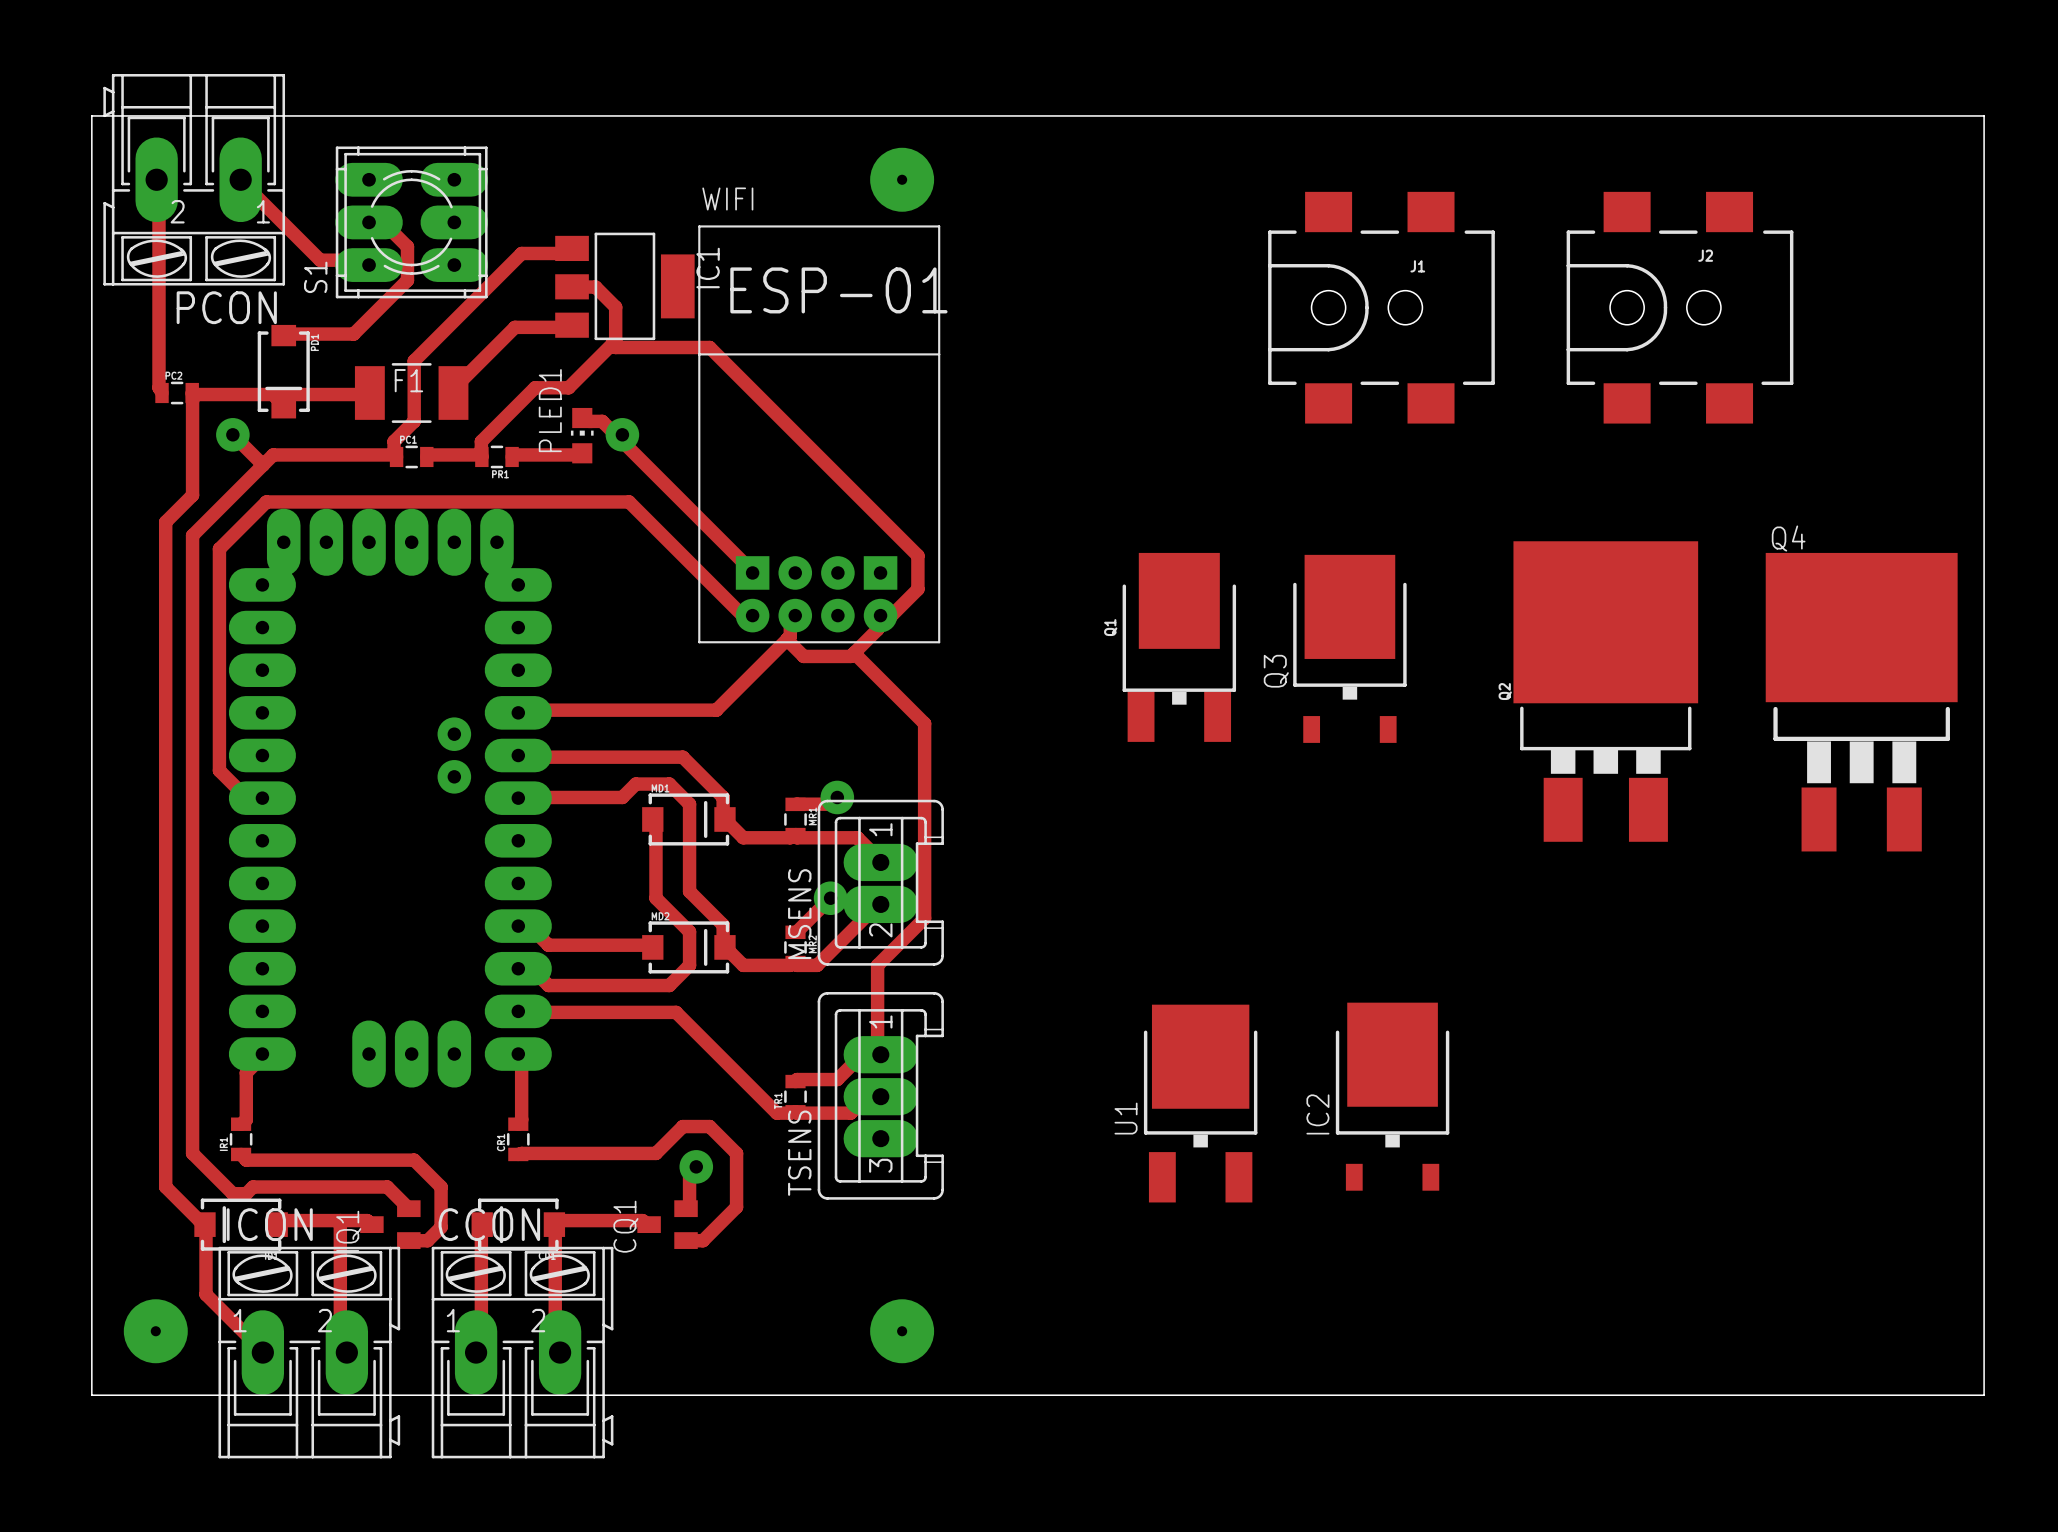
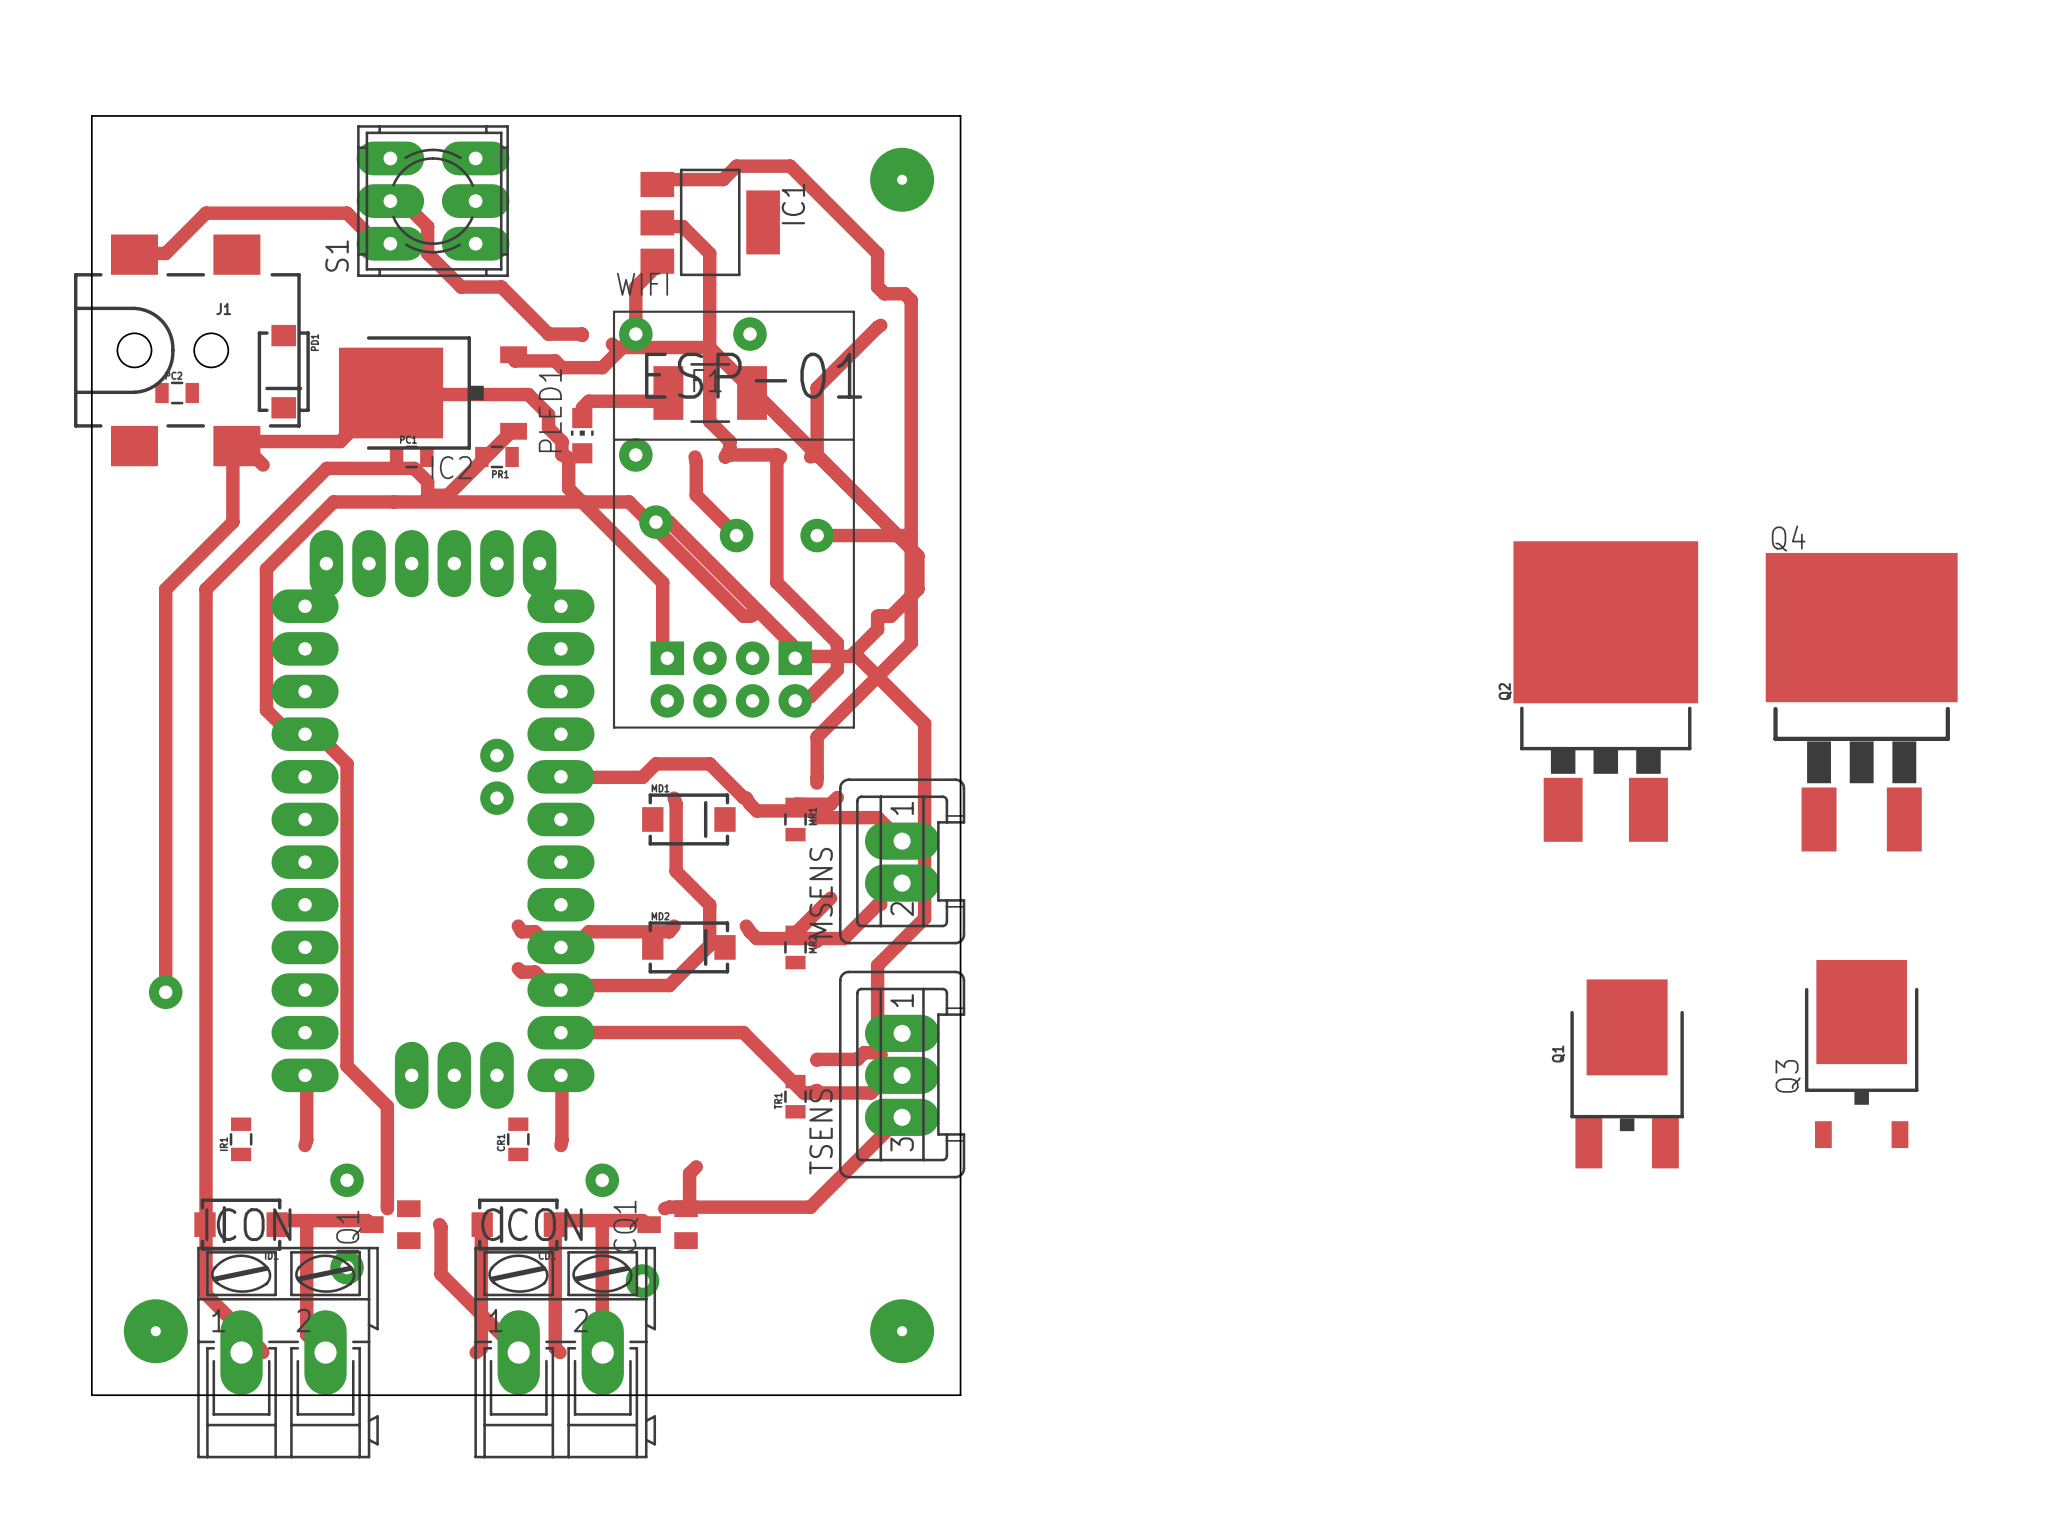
board edge: (960, 115) (1984, 115) (1984, 1395) (960, 1395) -> (960, 115) (960, 1395)
track: (156, 179) (158, 186) (158, 387) (162, 393) -> none
PCON: (194, 179) -> none
track: (240, 179) (320, 260) (367, 260) (369, 265) -> none
track: none -> (657, 184) (662, 179) (723, 179) (736, 166) (790, 166) (877, 253) (877, 287) (884, 293) (904, 293) (911, 300) (911, 643) (817, 737) (816, 783)
track: none -> (390, 201) (394, 206) (407, 206) (427, 226) (427, 253) (461, 287) (501, 287) (548, 334) (582, 334) (582, 335)
track: (369, 222) (373, 226) (387, 226) (407, 246) (407, 280) (353, 334) (283, 335) -> none
S1 position: (411, 222) -> (433, 201)
track: none -> (657, 222) (662, 226) (682, 226) (709, 253) (709, 421) (729, 441) (729, 448) (725, 456) (729, 454) (776, 454) (780, 456) (776, 461) (776, 582) (837, 643) (837, 669) (810, 696) (797, 696) (795, 700)
track: none -> (390, 243) (387, 240) (373, 240) (347, 213) (206, 213) (165, 253) (134, 254)
track: (572, 248) (568, 253) (521, 253) (414, 360) (414, 421) (394, 441) (394, 454) -> none
track: none -> (657, 261) (655, 266) (635, 287) (635, 334) (602, 367) (561, 367) (555, 360) (514, 360) (513, 354)
track: (572, 286) (595, 287) (615, 307) (615, 340) (568, 387) (535, 387) (481, 441) (481, 456) (481, 454) (427, 454) (426, 456) -> none
IC1 position: (624, 286) -> (710, 222)
J1 position: (1381, 307) -> (187, 350)
J2: (1680, 307) -> none
track: (572, 325) (568, 327) (514, 327) (454, 387) (453, 393) -> none
track: none -> (880, 325) (817, 387) (817, 454) (810, 456)
via: none -> (635, 334)
via: none -> (750, 334)
track: (369, 393) (279, 394) (276, 397) -> none
F1 position: (411, 393) -> (710, 393)
track: none -> (668, 393) (662, 394) (655, 401) (588, 401) (582, 407)
track: (283, 407) (273, 394) (192, 394) (192, 393) (192, 495) (165, 522) (165, 589) -> (667, 658) (662, 656) (662, 582) (568, 488) (568, 461) (567, 456) (561, 454) (561, 441) (548, 428) (548, 414) (528, 394) (391, 393) (340, 441) (239, 441) (232, 448) (232, 522) (165, 589)
track: (582, 418) (588, 421) (602, 421) (752, 572) -> none
track: none -> (513, 431) (447, 495) (427, 495)
via: (232, 434) -> none
via position: (622, 434) -> (635, 454)
WIFI position: (819, 434) -> (733, 519)
track: (582, 453) (582, 454) (514, 454) (512, 456) -> none
track: (394, 454) (273, 454) (192, 535) (192, 1153) (232, 1193) (246, 1193) (253, 1187) (387, 1187) (408, 1208) -> none
track: none -> (695, 456) (696, 495) (736, 535)
track: (333, 501) (266, 501) (219, 548) (219, 770) (246, 797) (262, 798) -> (333, 501) (266, 569) (266, 710) (286, 730) (300, 730) (306, 737) (320, 737) (347, 763) (347, 1066) (387, 1106) (387, 1208)
track: none -> (655, 522) (669, 522) (786, 639)
via: none -> (655, 522)
via: none -> (736, 535)
track: none -> (817, 535) (911, 535)
via: none -> (817, 535)
track: (795, 615) (790, 616) (790, 636) (716, 710) (521, 710) (518, 712) -> none
Q1 position: (1179, 647) -> (1627, 1073)
Q3 position: (1349, 648) -> (1861, 1054)
track: (518, 755) (521, 757) (682, 757) (723, 797) (723, 817) (743, 837) (790, 837) (795, 834) (797, 837) (857, 837) (880, 862) -> none
track: none -> (560, 776) (642, 777) (655, 763) (709, 763) (743, 797) (746, 798) (756, 810) (810, 810) (816, 813) (817, 817) (877, 817) (902, 841)
via: (837, 797) -> none
part position: (390, 798) -> (433, 819)
track: (518, 798) (622, 797) (635, 784) (669, 784) (689, 804) (689, 891) (723, 925) (723, 945) (743, 965) (790, 965) (795, 962) (797, 965) (817, 965) (844, 938) -> (746, 926) (756, 938) (810, 938) (816, 941) (817, 938) (844, 938)
track: (652, 819) (655, 824) (655, 898) (689, 931) (689, 965) -> (674, 798) (676, 804) (676, 871) (709, 904) (709, 945) (689, 965)
MSENS position: (880, 882) -> (902, 861)
via: (830, 898) -> none
track: (575, 945) (649, 945) (652, 947) -> (575, 945) (588, 931) (669, 931) (674, 926)
track: (165, 992) (165, 1187) (204, 1224) -> (427, 495) (427, 481) (414, 468) (326, 468) (206, 589) (204, 1224)
via: none -> (165, 992)
track: (518, 1011) (676, 1012) (776, 1113) (850, 1113) (864, 1099) (877, 1099) (880, 1096) -> none
track: none -> (560, 1032) (743, 1032) (803, 1092) (816, 1090) (817, 1092) (870, 1092) (891, 1072) (902, 1075)
track: (262, 1054) (246, 1072) (246, 1119) (241, 1124) -> none
track: (518, 1054) (521, 1059) (521, 1119) (518, 1124) -> none
track: (857, 1059) (837, 1079) (797, 1079) (795, 1081) -> (857, 1059) (816, 1060)
track: none -> (305, 1075) (306, 1079) (306, 1140) (305, 1145)
track: none -> (560, 1075) (560, 1145)
TSENS position: (880, 1095) -> (902, 1074)
IC2 rotation: 0° (1392, 1096) -> 90° counterclockwise (433, 393)
IC2 position: (1392, 1096) -> (433, 393)
U1: (1200, 1103) -> none
track: none -> (902, 1117) (810, 1207) (664, 1208)
track: (241, 1154) (246, 1160) (414, 1160) (441, 1187) (441, 1227) (427, 1240) (408, 1240) -> none
track: (518, 1154) (655, 1153) (682, 1126) (709, 1126) (736, 1153) (736, 1207) (702, 1240) (686, 1240) -> none
via: (696, 1166) -> none
via: none -> (347, 1180)
via: none -> (602, 1180)
track: none -> (306, 1220) (306, 1334) (325, 1352)
track: (340, 1220) (340, 1348) (346, 1352) -> none
track: none -> (602, 1220) (602, 1352)
track: none -> (439, 1224) (441, 1274) (518, 1352)
via: none -> (347, 1267)
via: none -> (642, 1281)
ICON position: (309, 1352) -> (288, 1352)
CCON position: (522, 1352) -> (565, 1352)

